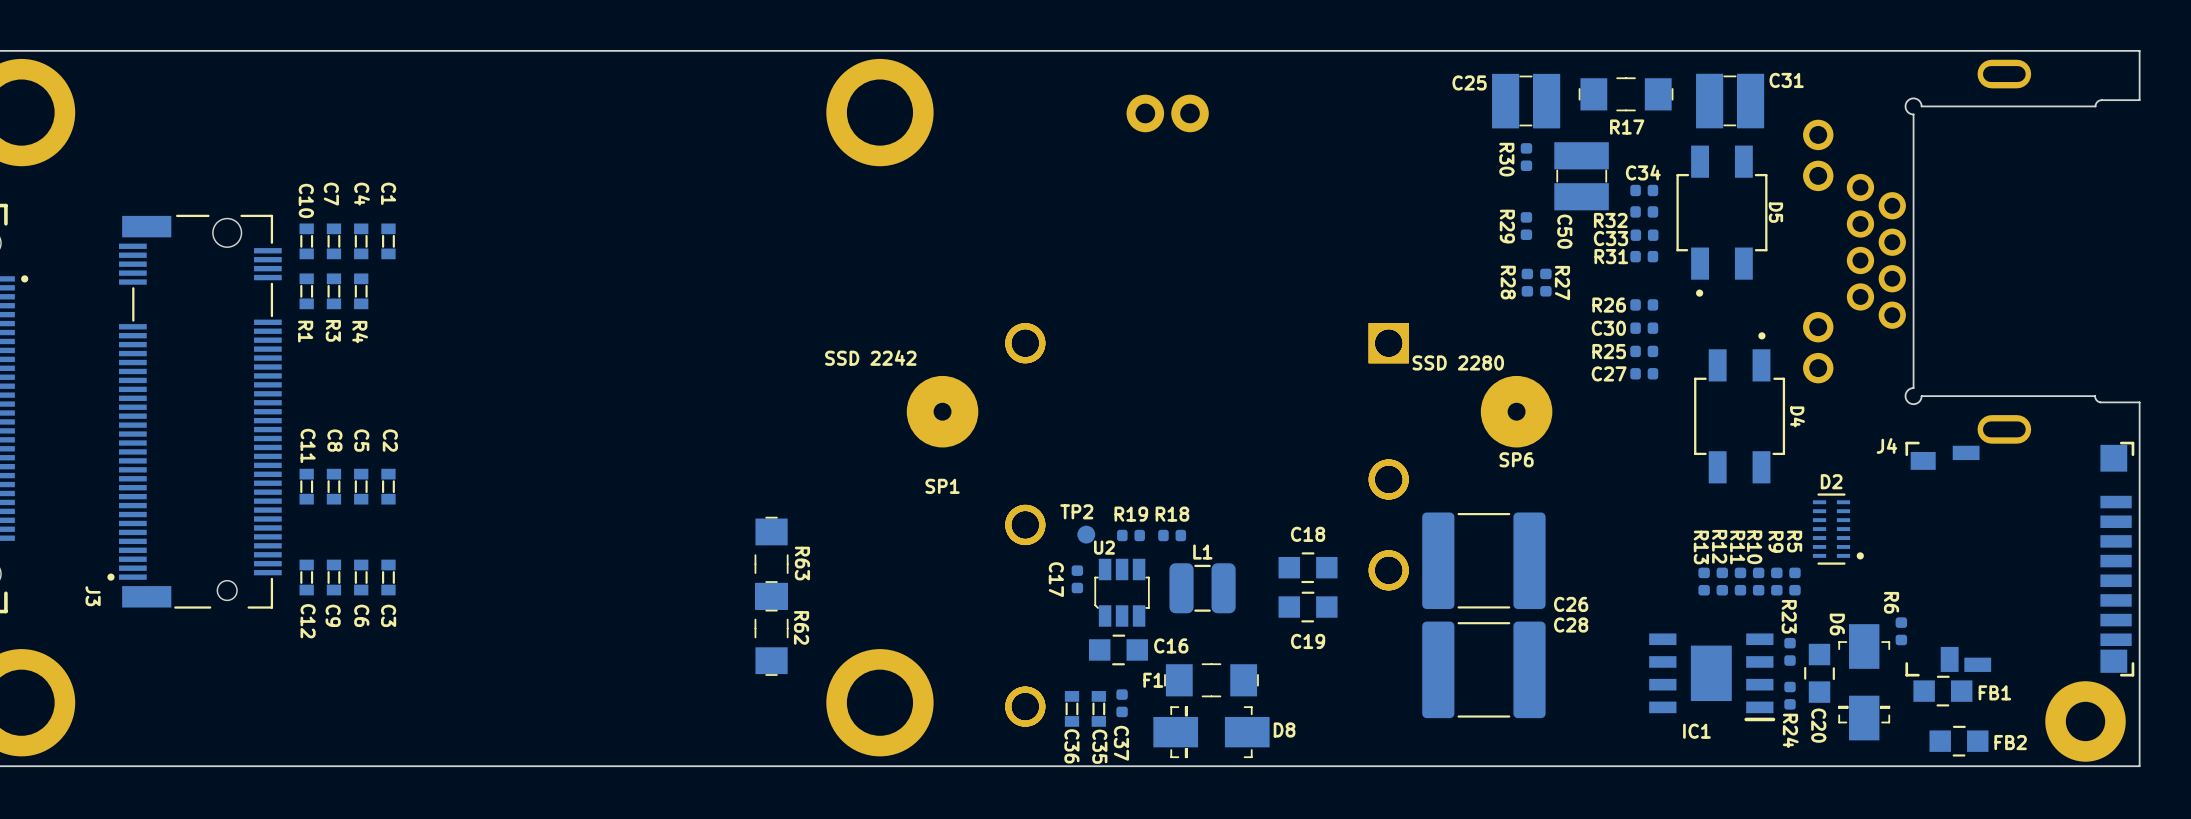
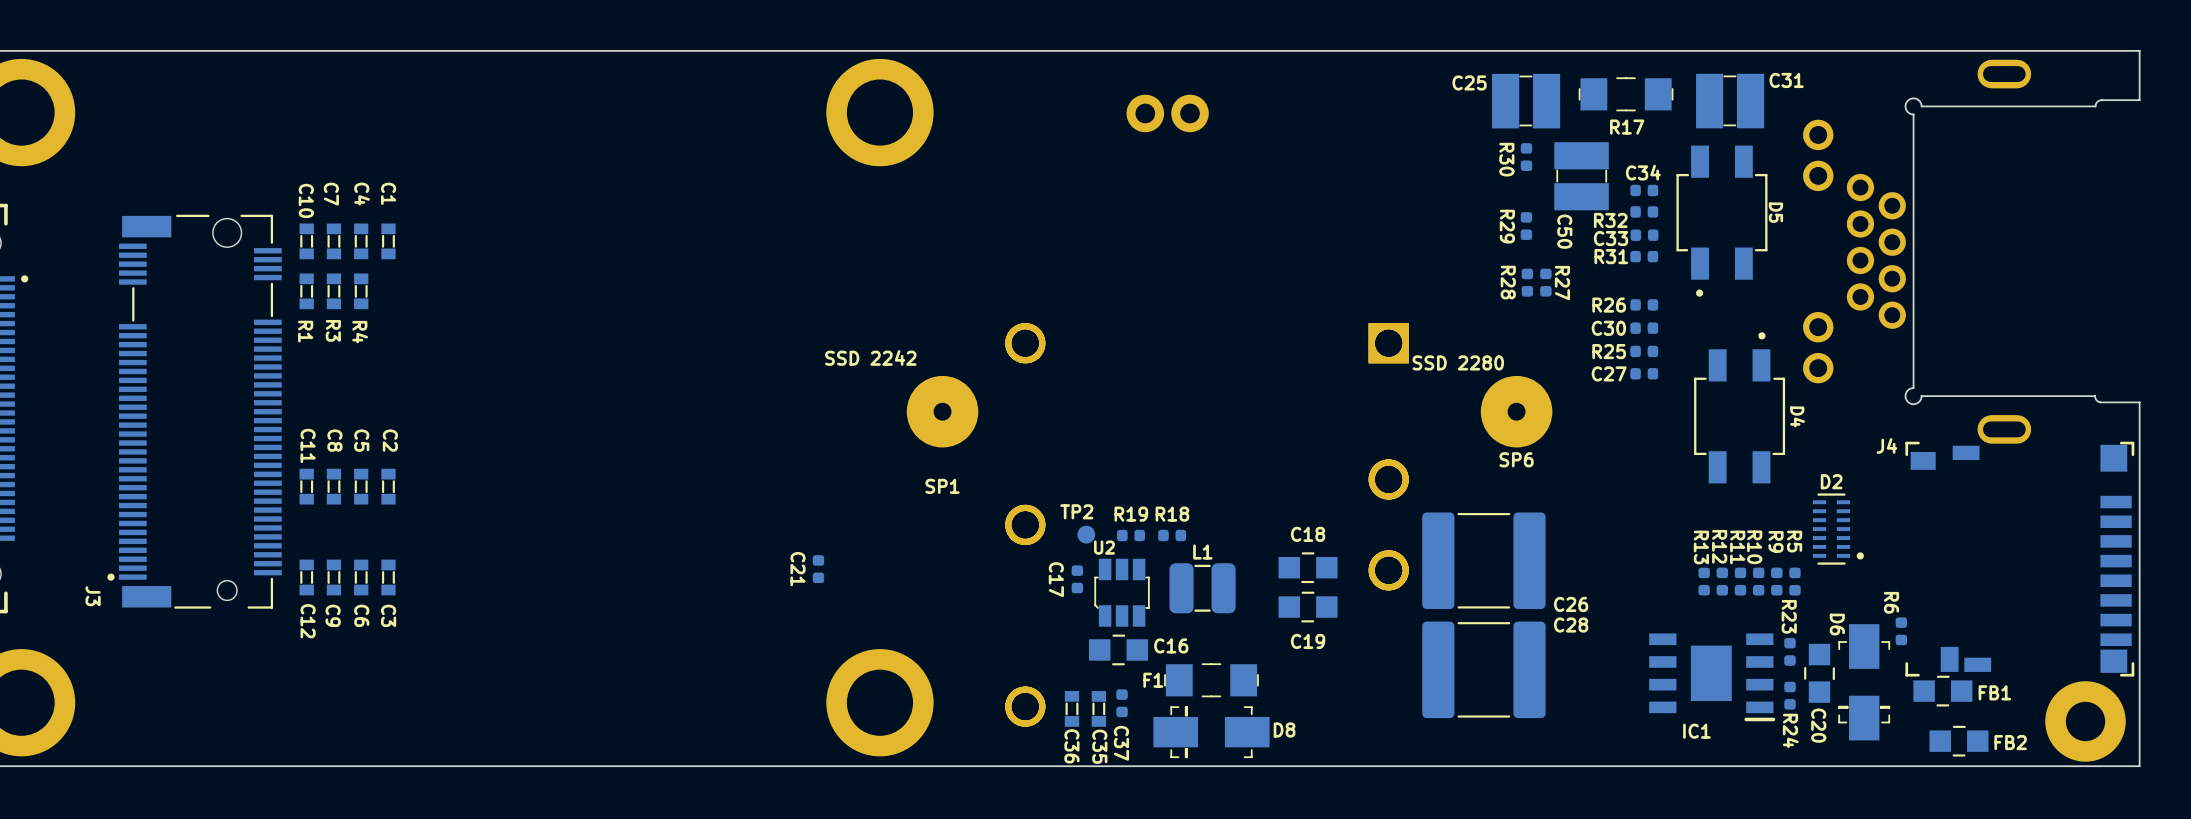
R63: (771, 564) -> none
C21: none -> (818, 569)
R62: (771, 628) -> none

